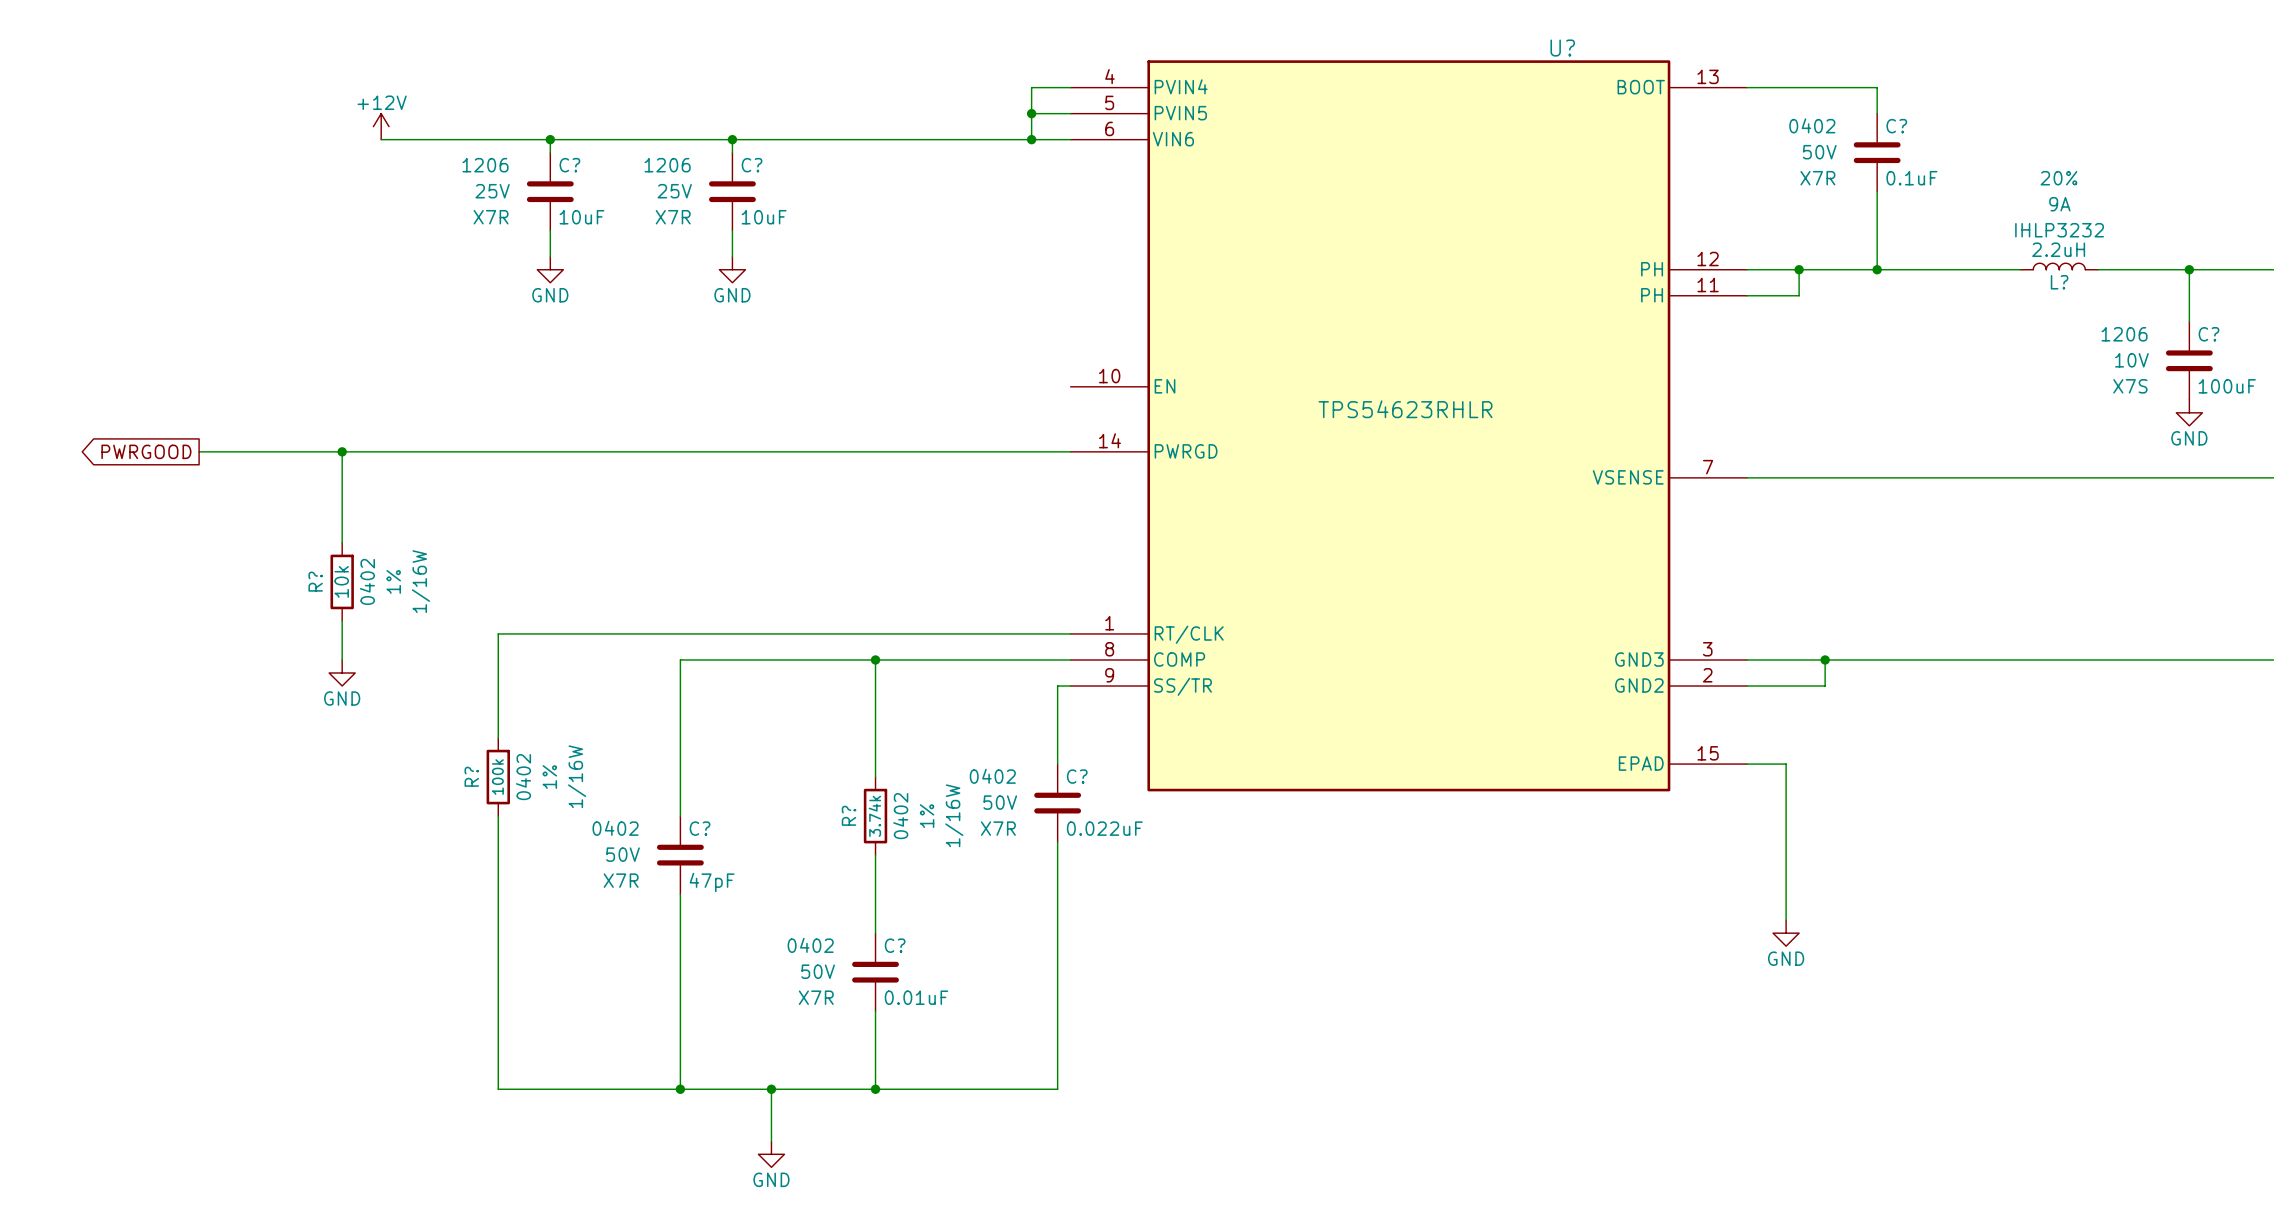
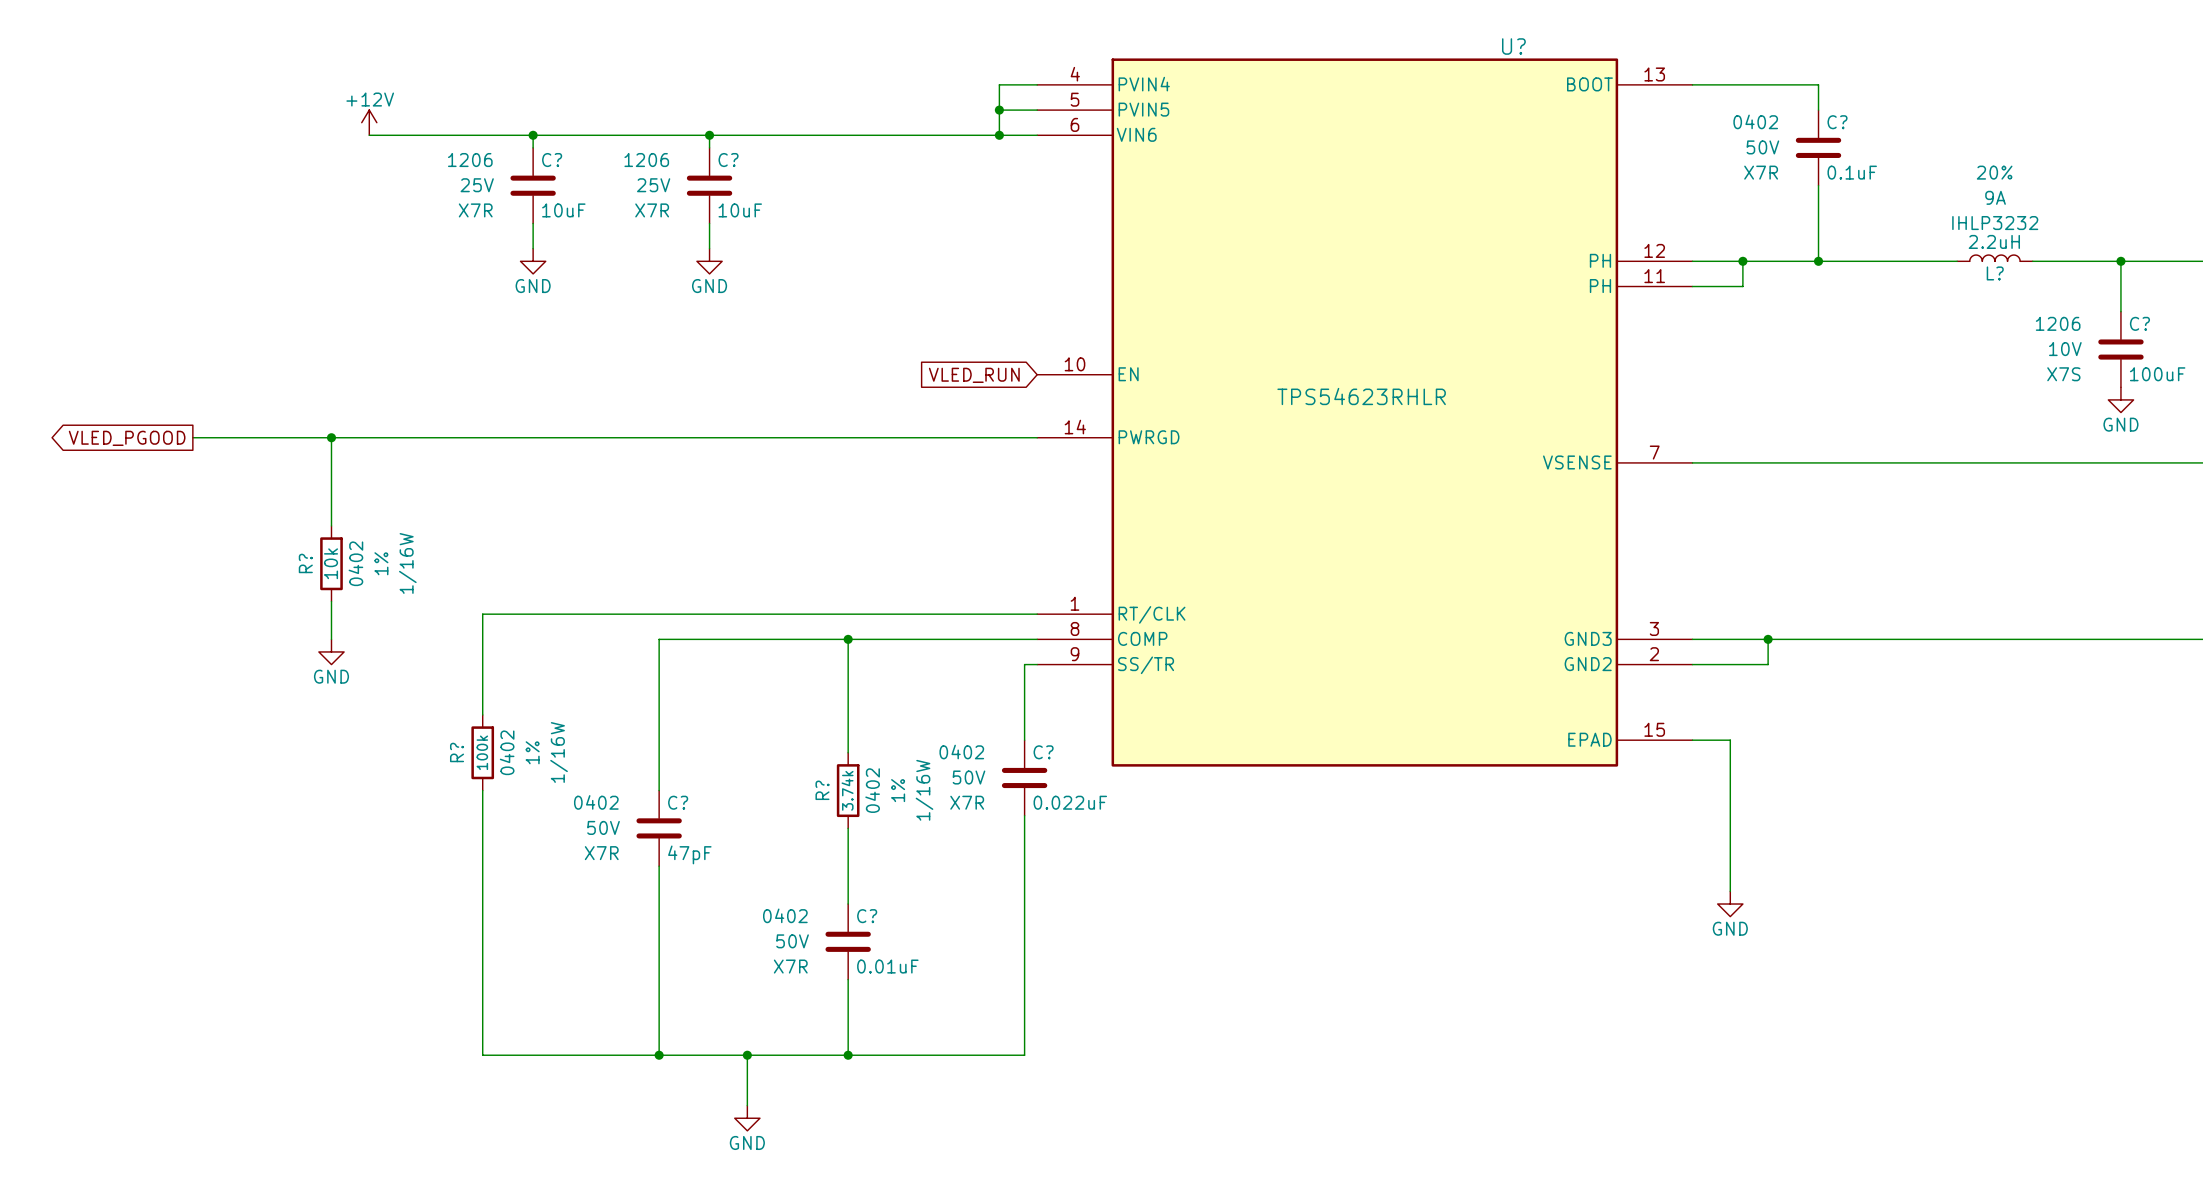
global label: none -> VLED_RUN (974, 375)
global label: PWRGOOD (146, 451) -> VLED_PGOOD (127, 438)

